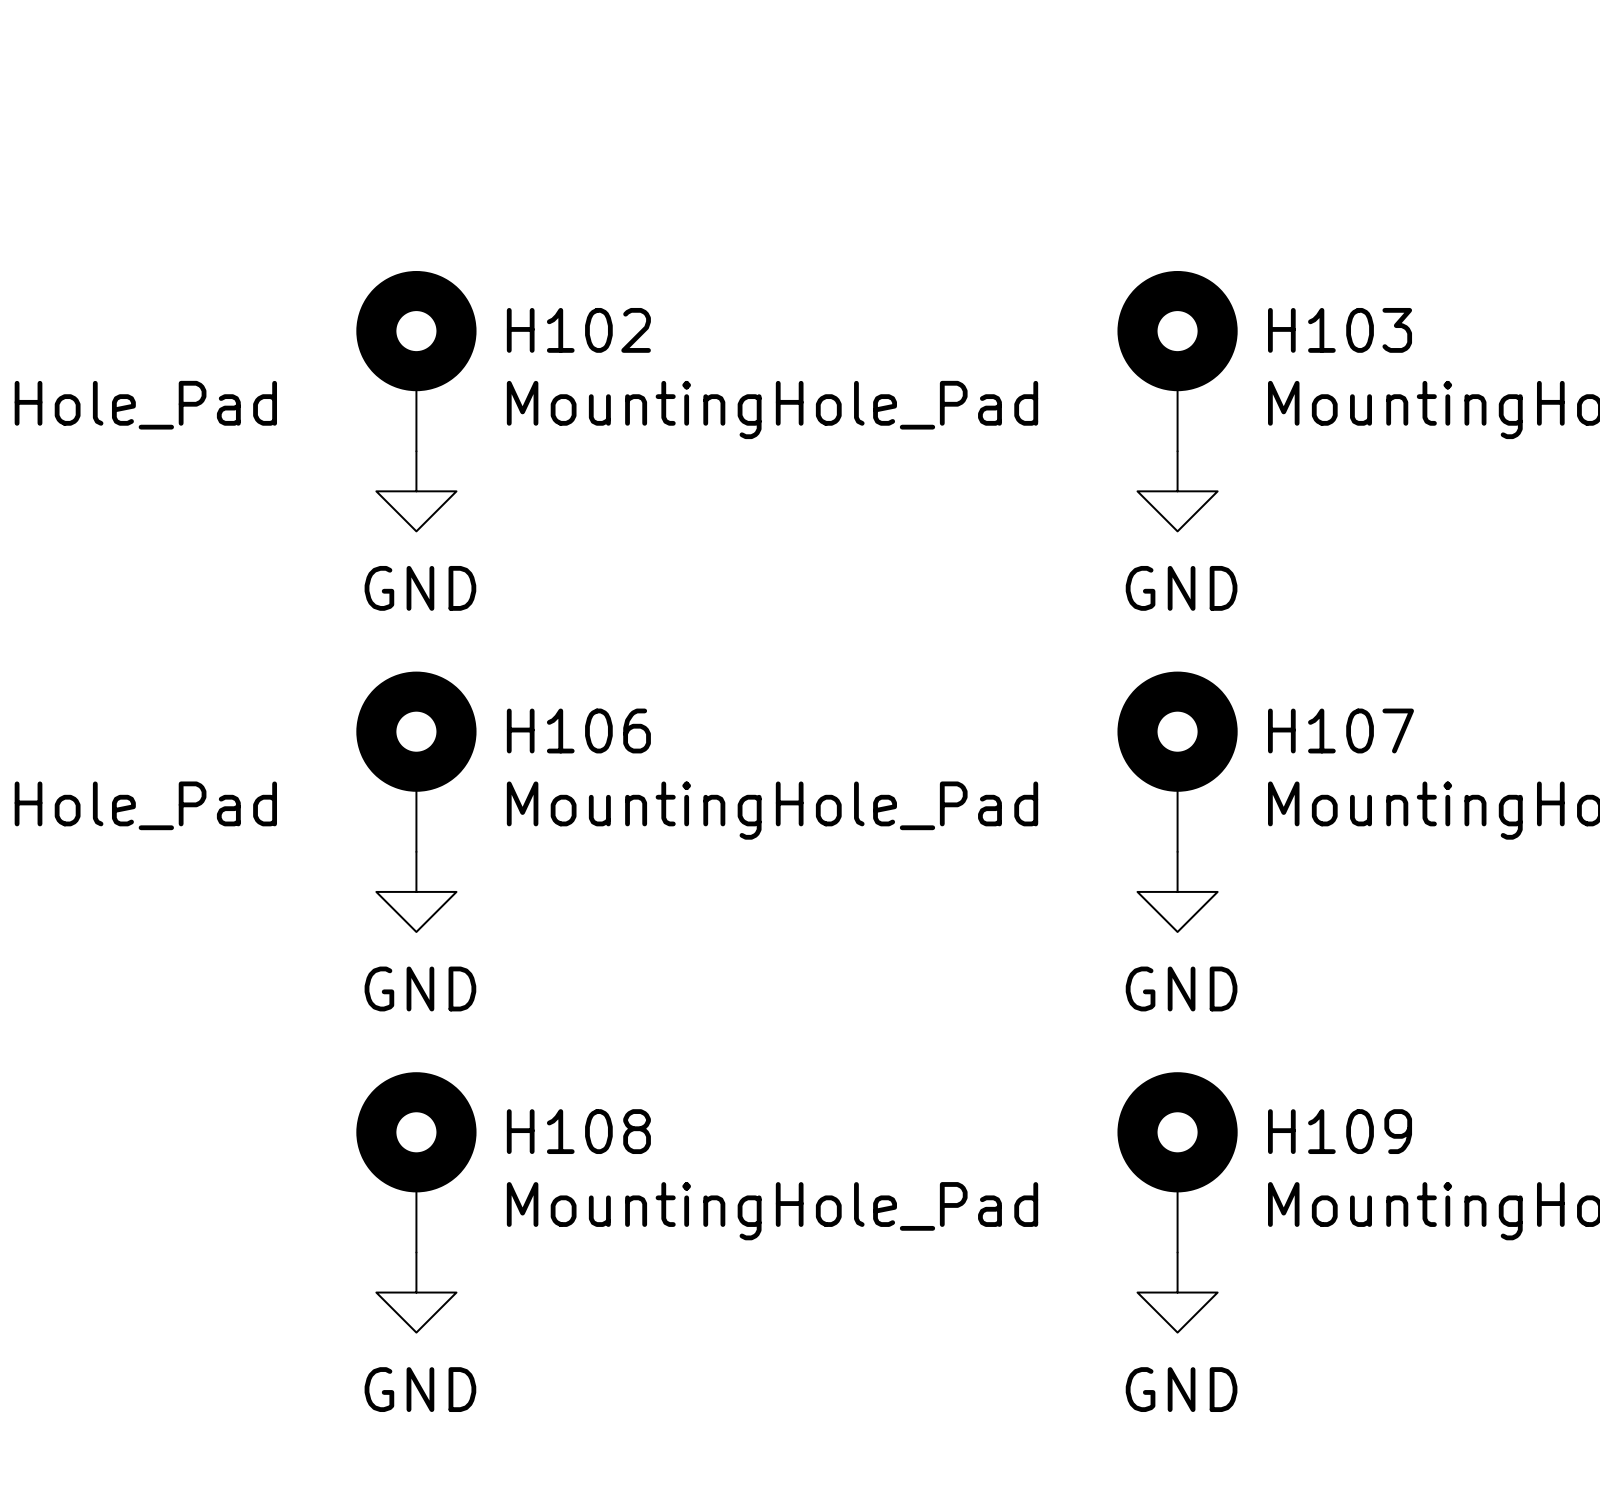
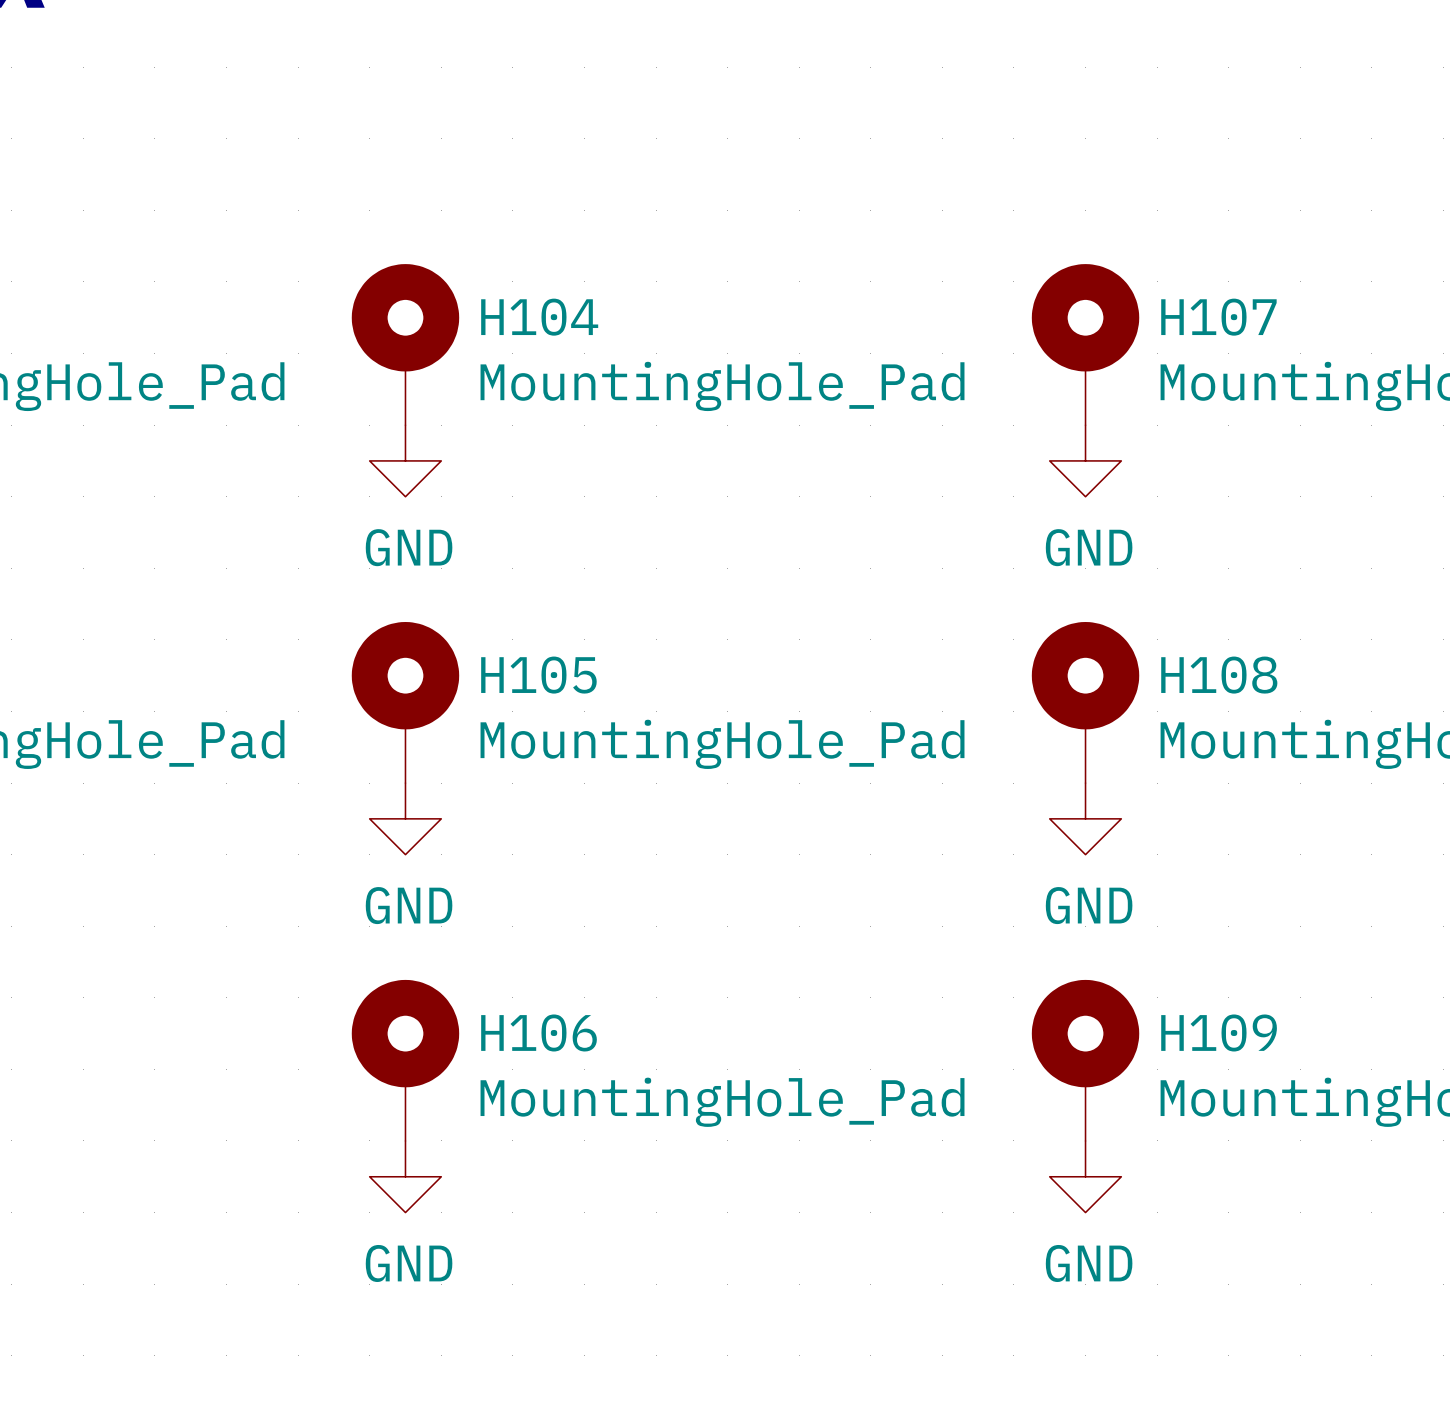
H102 name: H102 (578, 330) -> H104 (539, 317)
H103 name: H103 (1340, 330) -> H107 (1218, 317)
H106 name: H106 (578, 730) -> H105 (538, 675)
H107 name: H107 (1340, 730) -> H108 (1219, 675)
H108 name: H108 (578, 1131) -> H106 (539, 1032)

